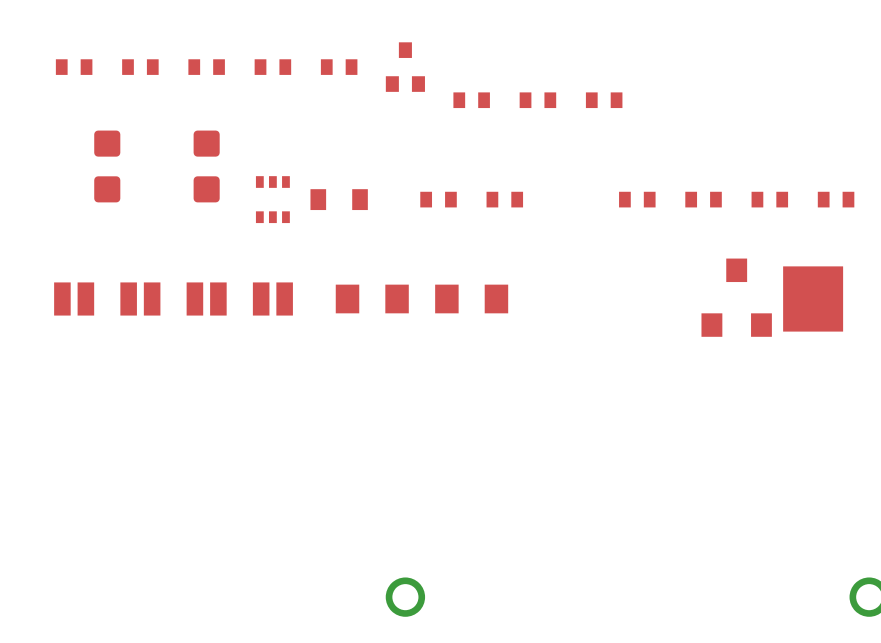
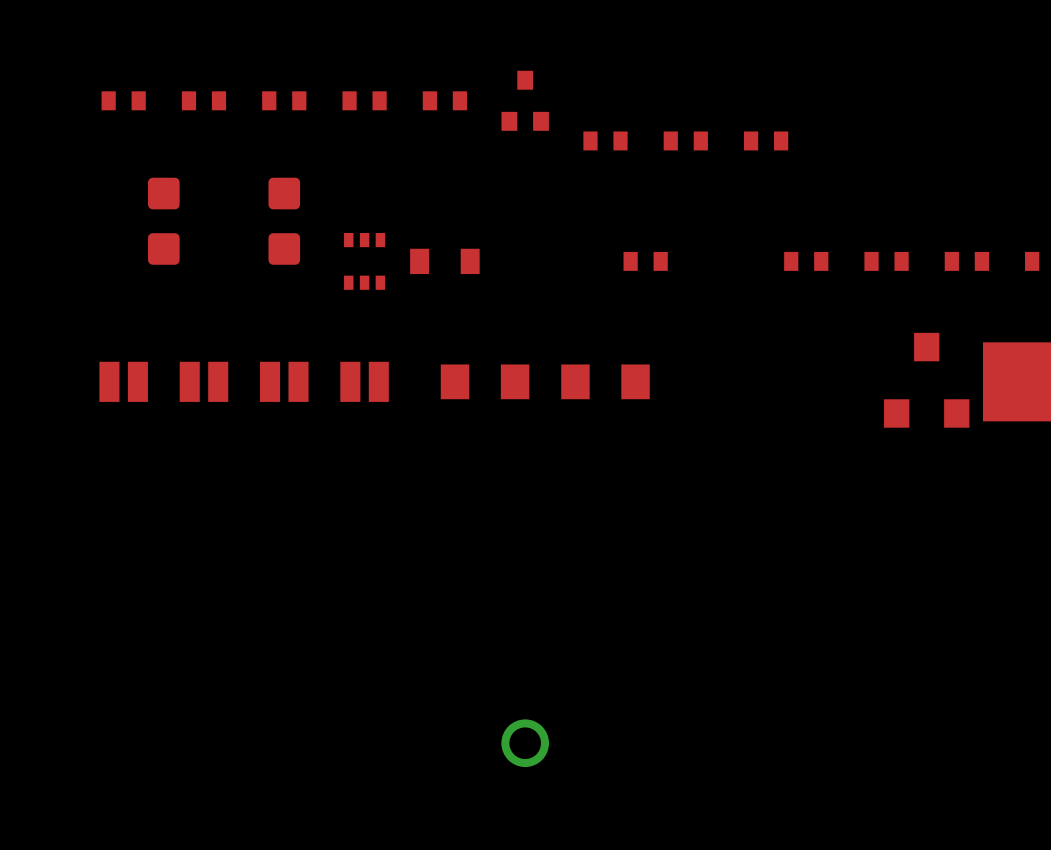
part: (438, 199) -> none

